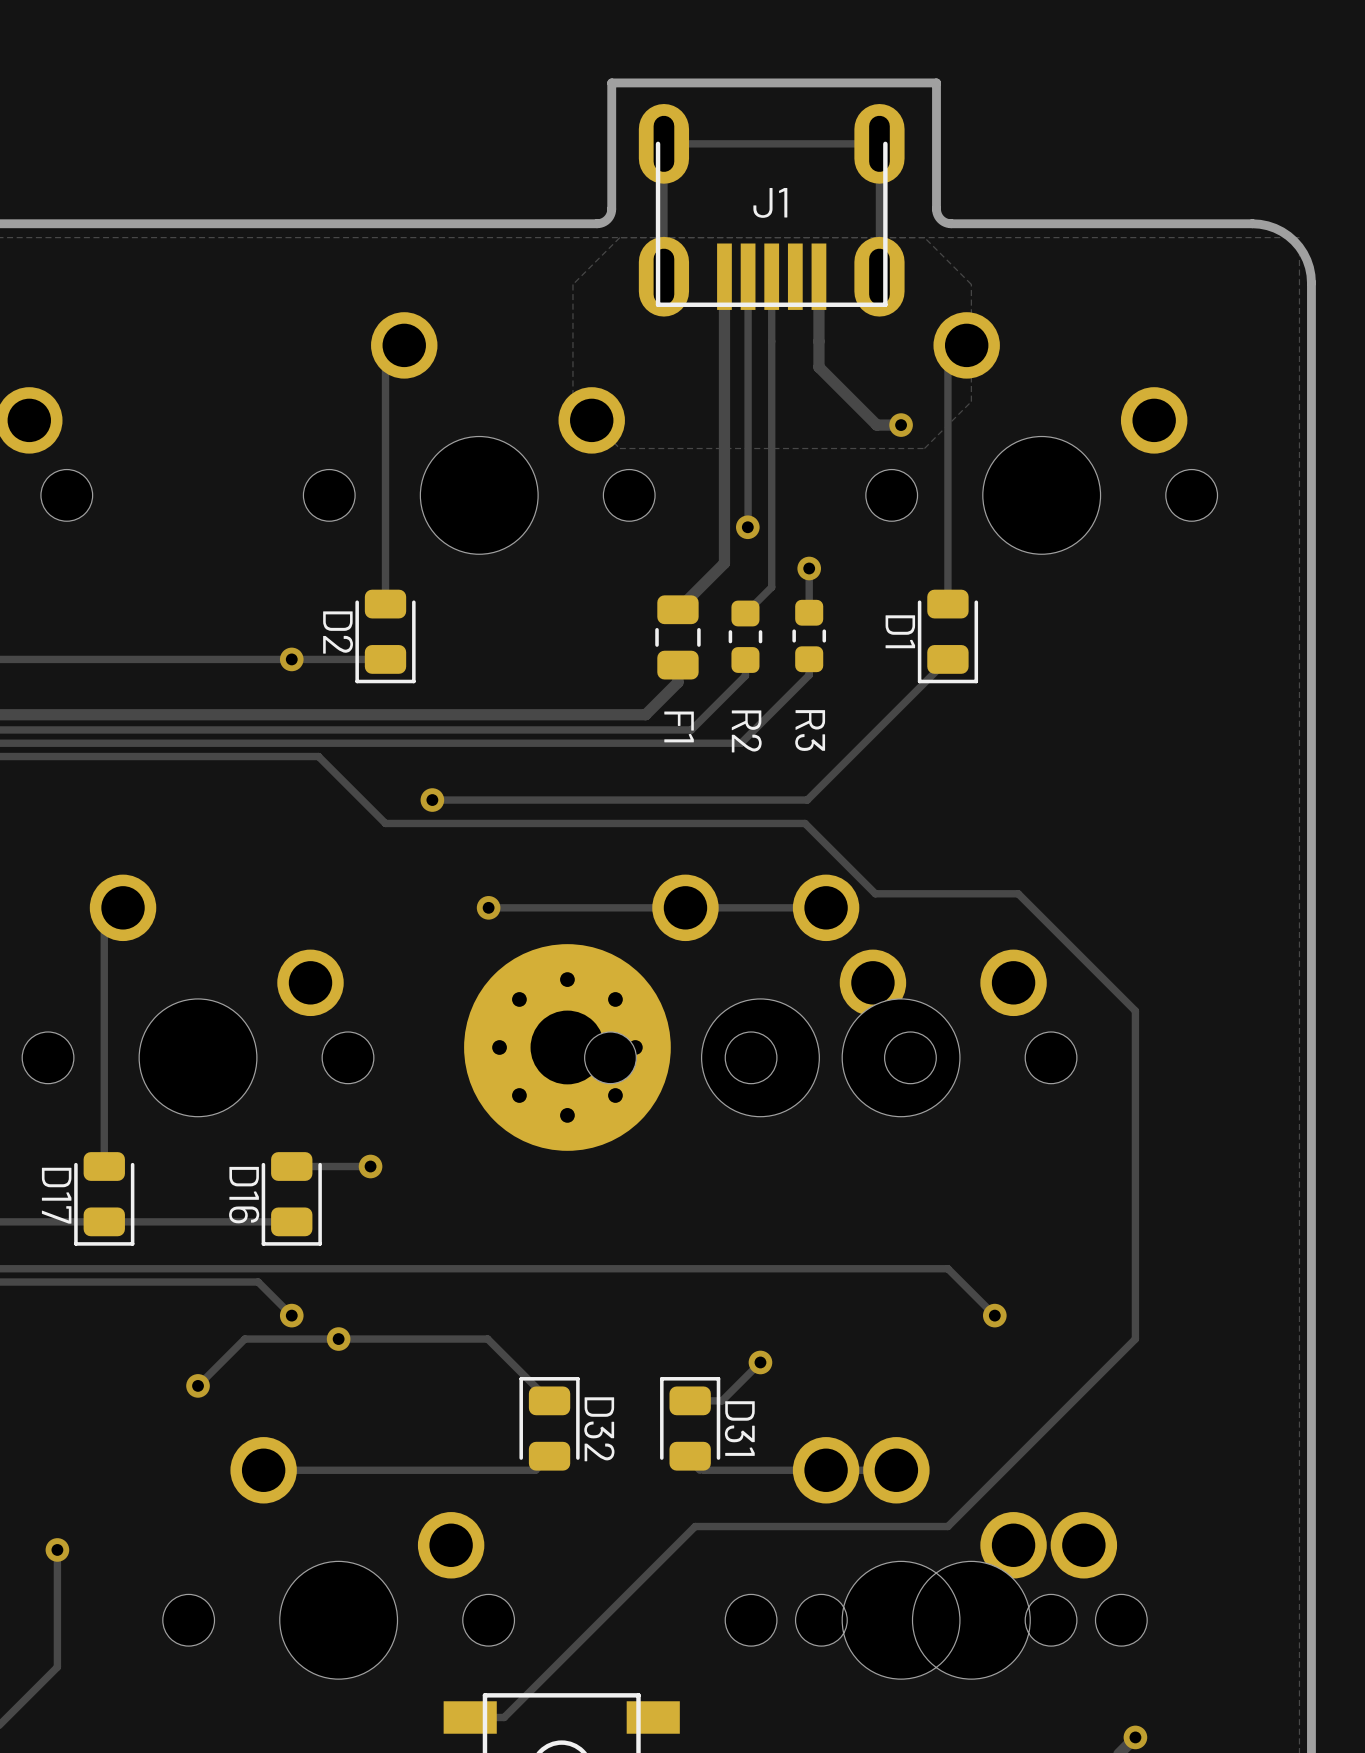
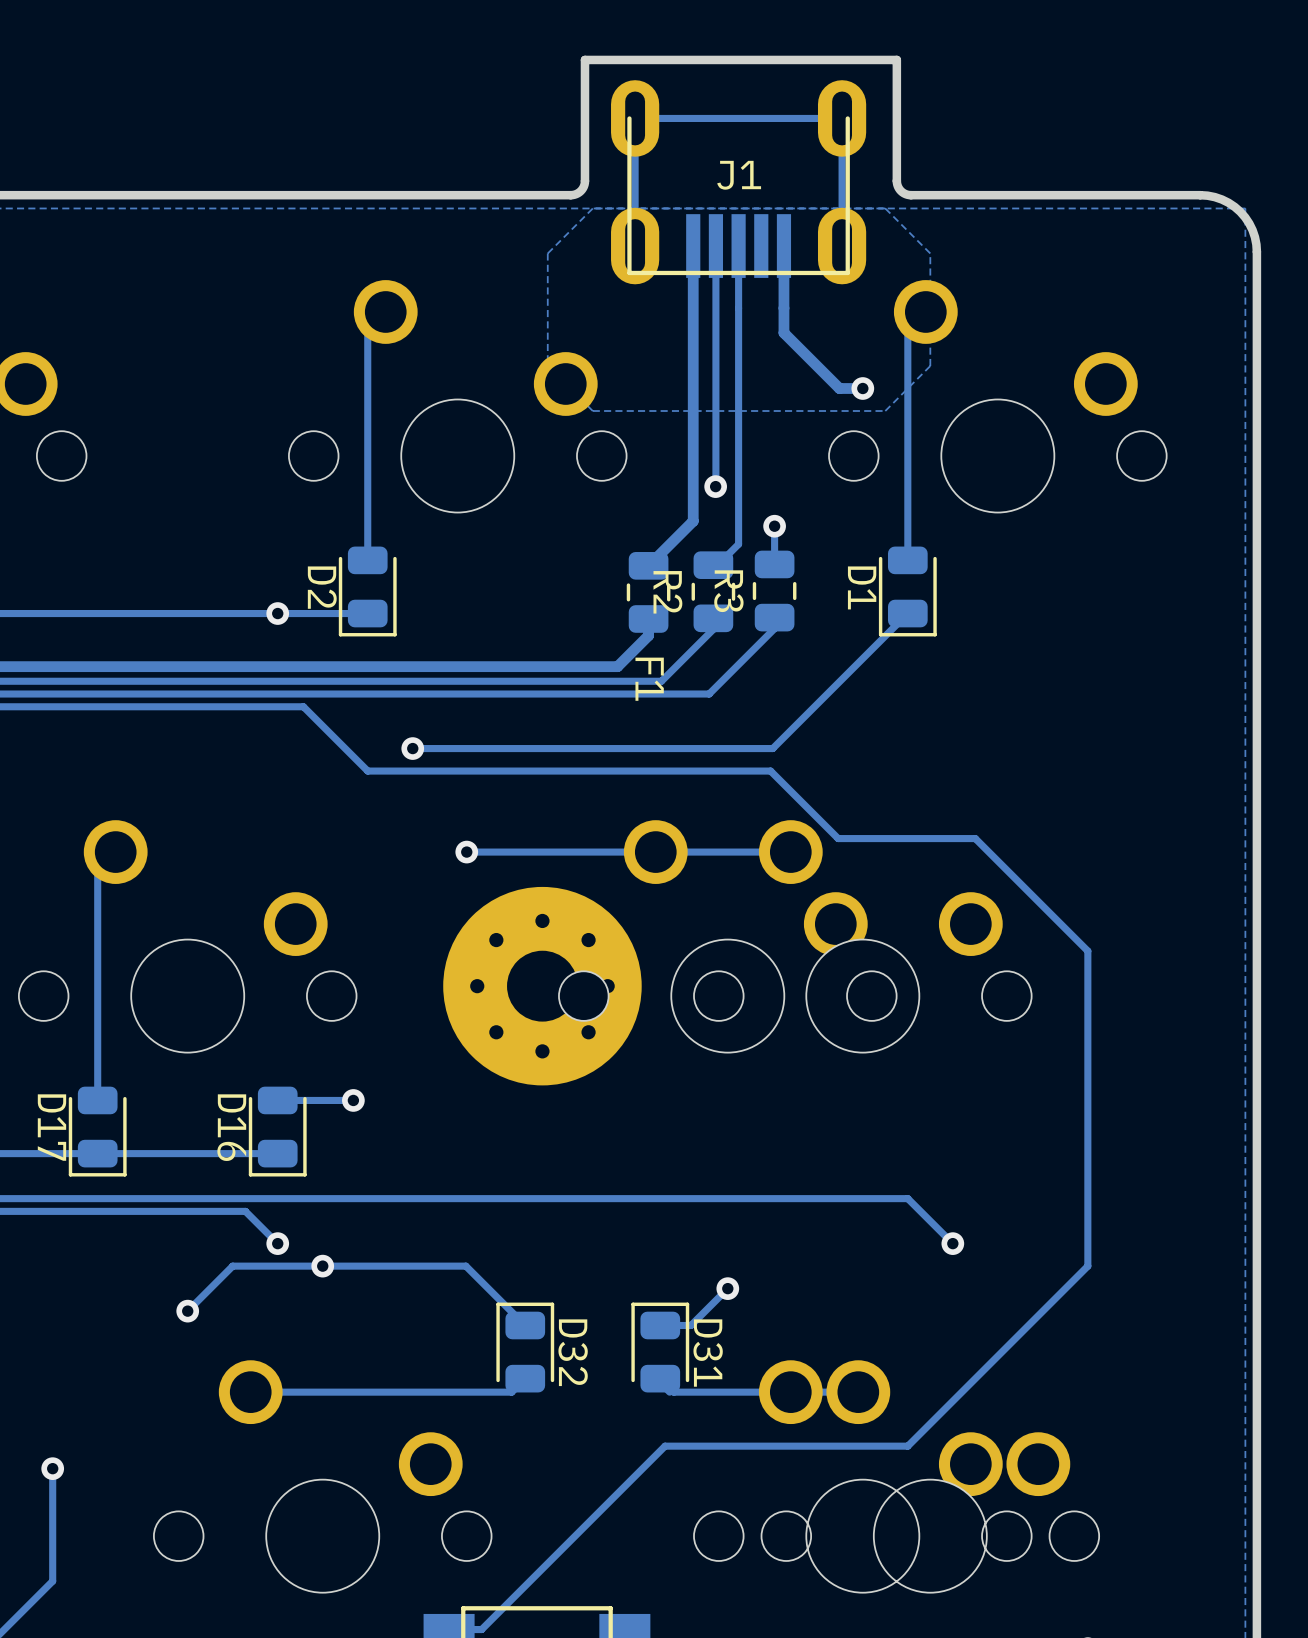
R3 footprint: [792, 599, 827, 673] -> [752, 550, 797, 632]
R2 footprint: [728, 600, 763, 673] -> [691, 551, 736, 633]
R3 name position: R3 (810, 730) -> R3 (728, 591)
R2 name position: R2 (746, 731) -> R2 (667, 592)

